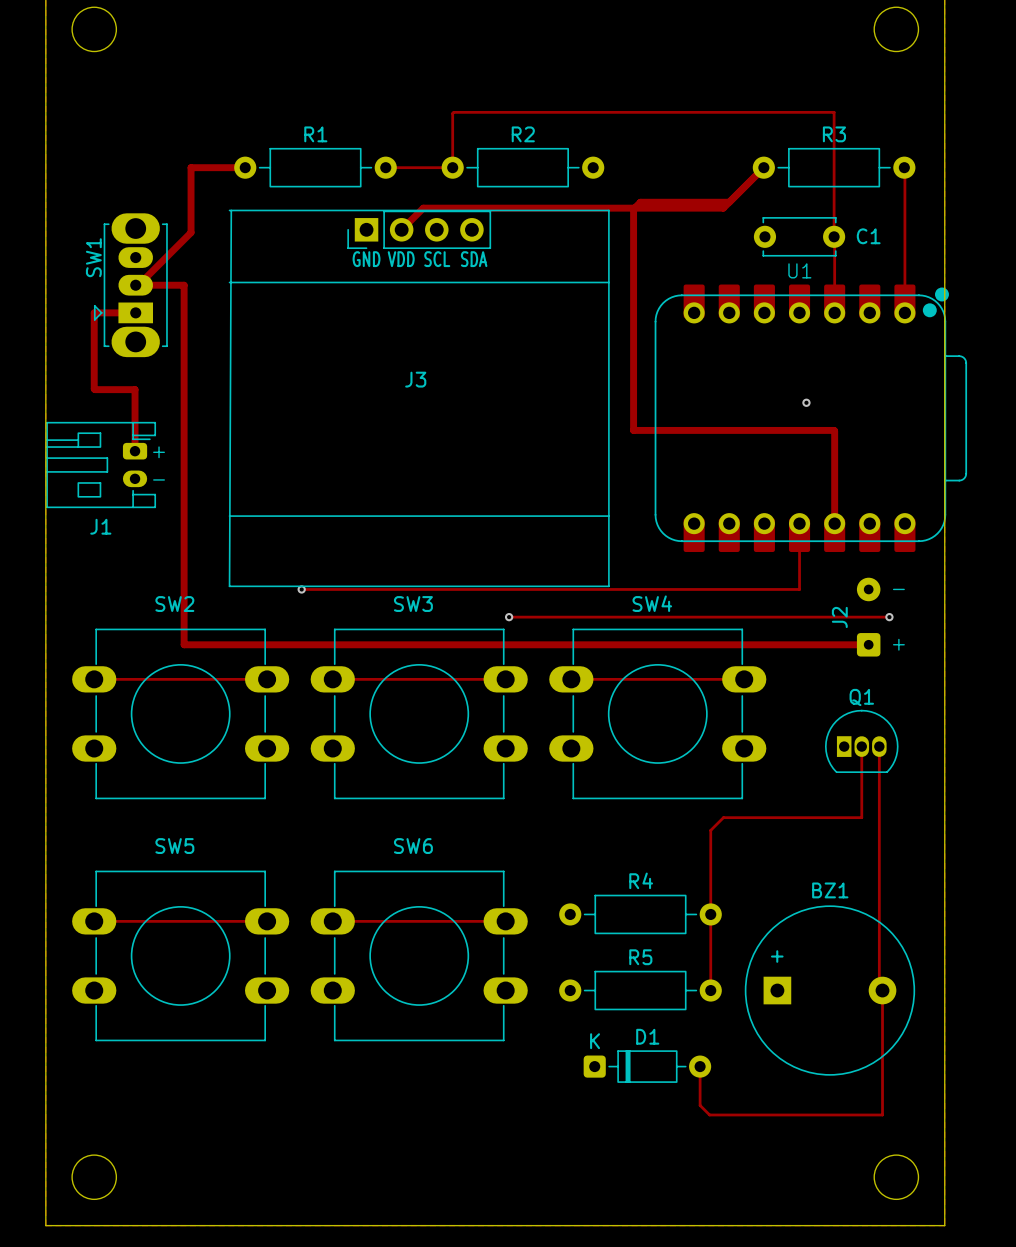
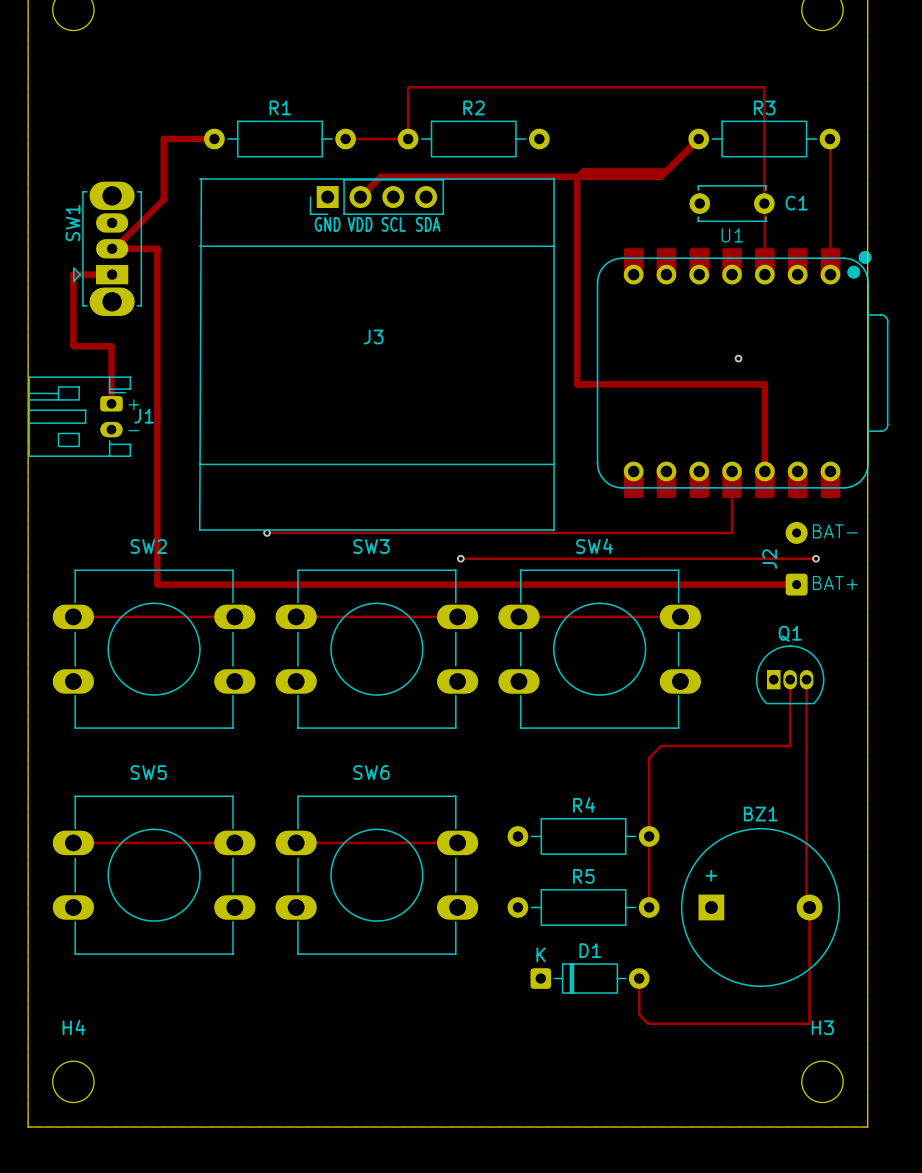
J1 name position: J1 (100, 526) -> J1 (144, 416)
text: - (898, 589) -> BAT- (835, 531)
text: + (898, 644) -> BAT+ (835, 583)
H4 name: none -> H4 (73, 1027)
H3 name: none -> H3 (822, 1027)

